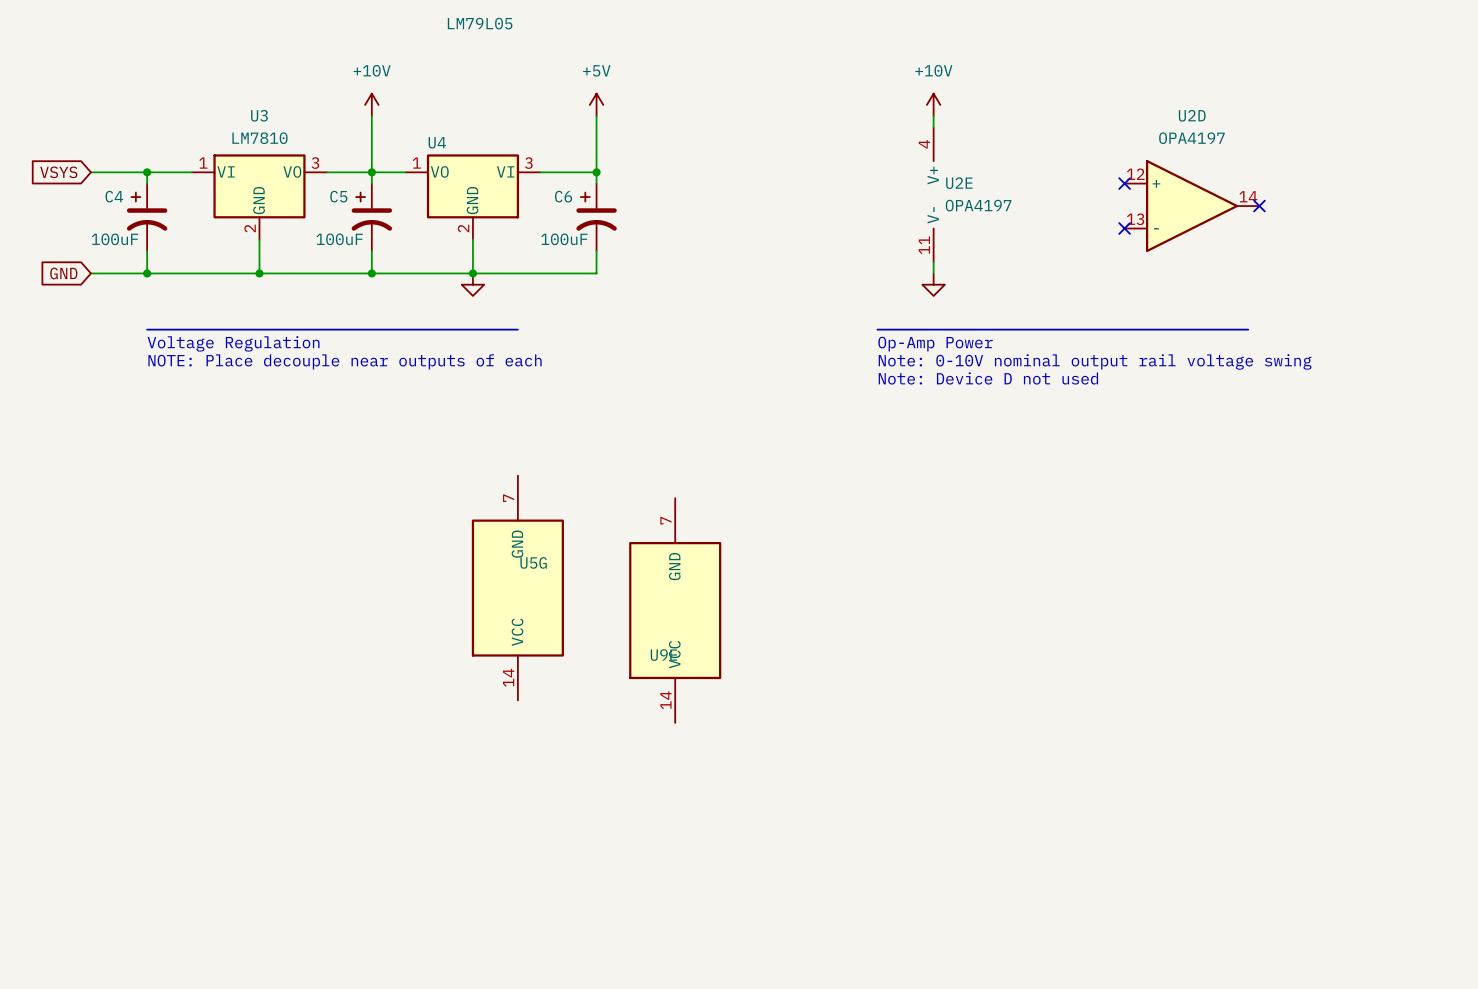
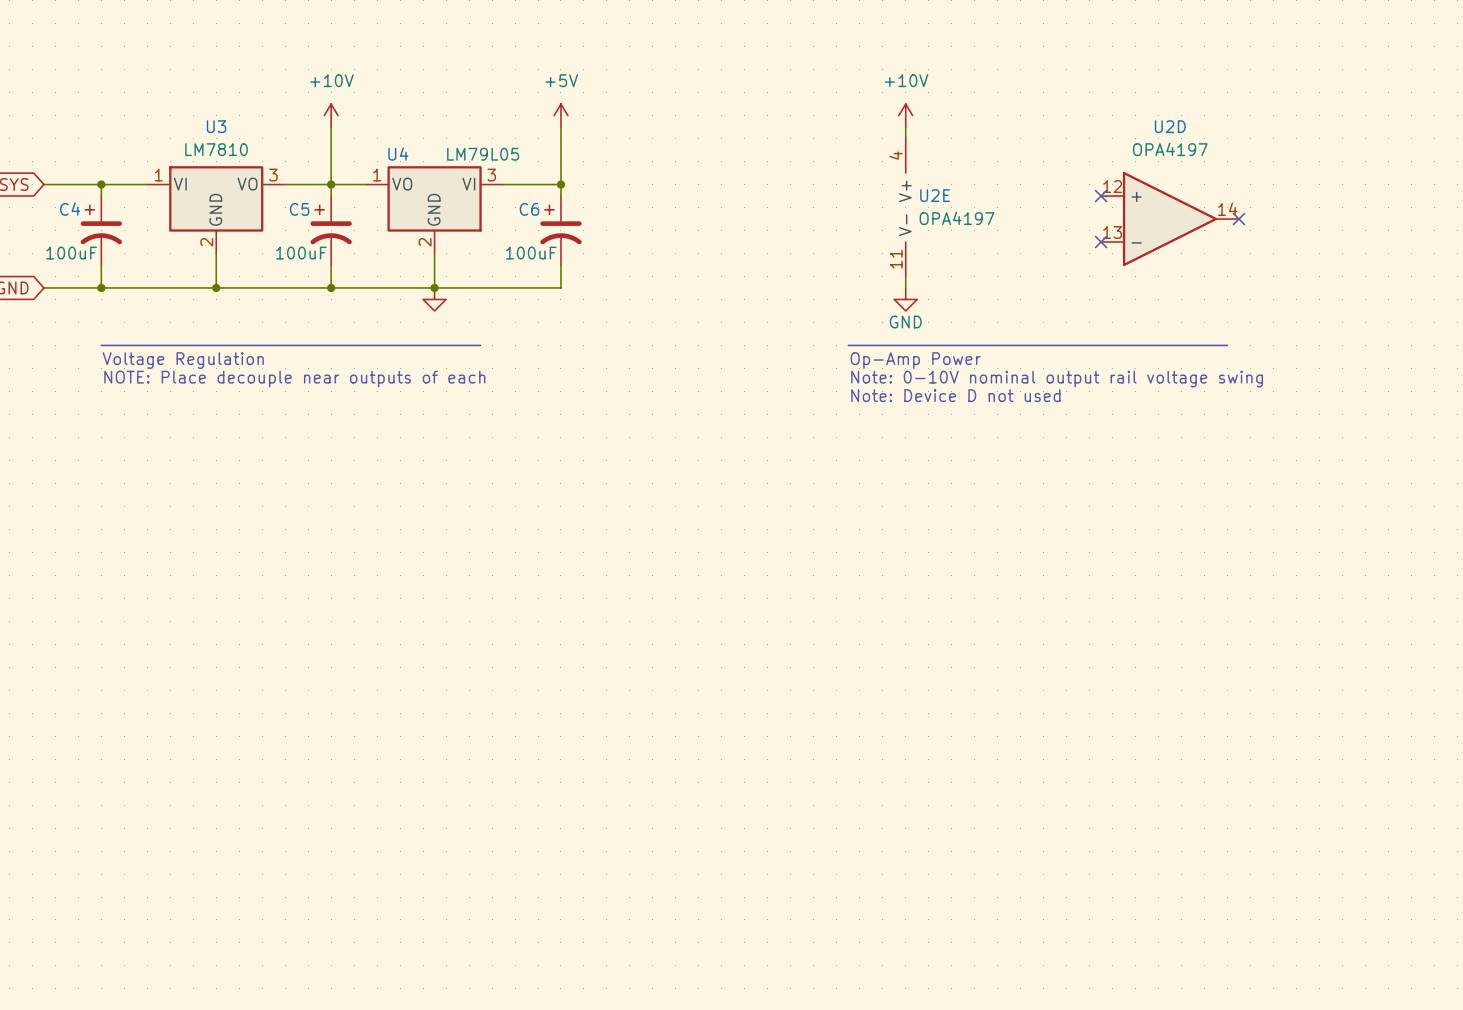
U4 value position: LM79L05 (480, 23) -> LM79L05 (483, 154)
power symbol text: none -> GND (905, 322)
U5G: (517, 588) -> none
U9E: (675, 610) -> none

